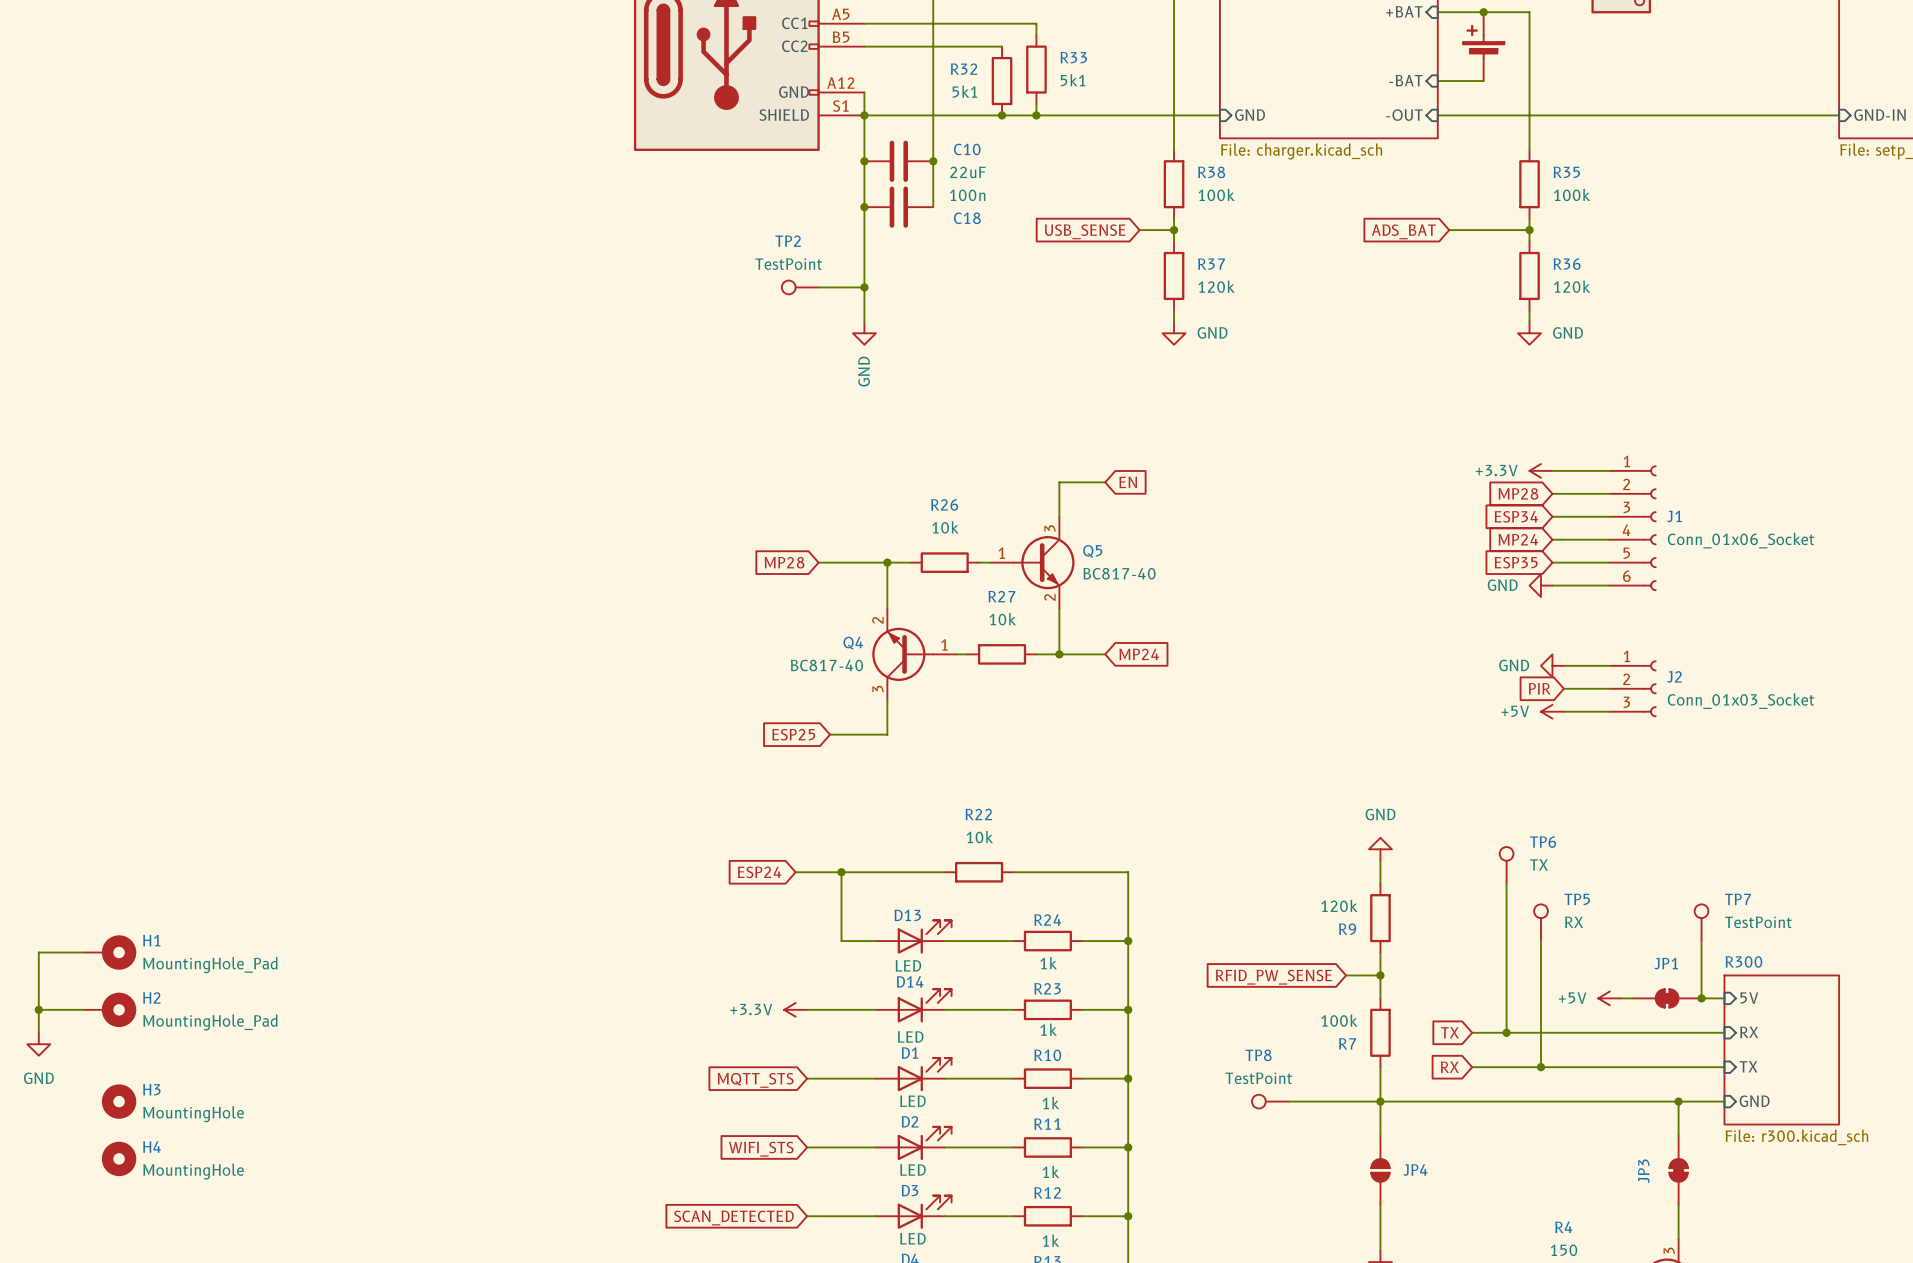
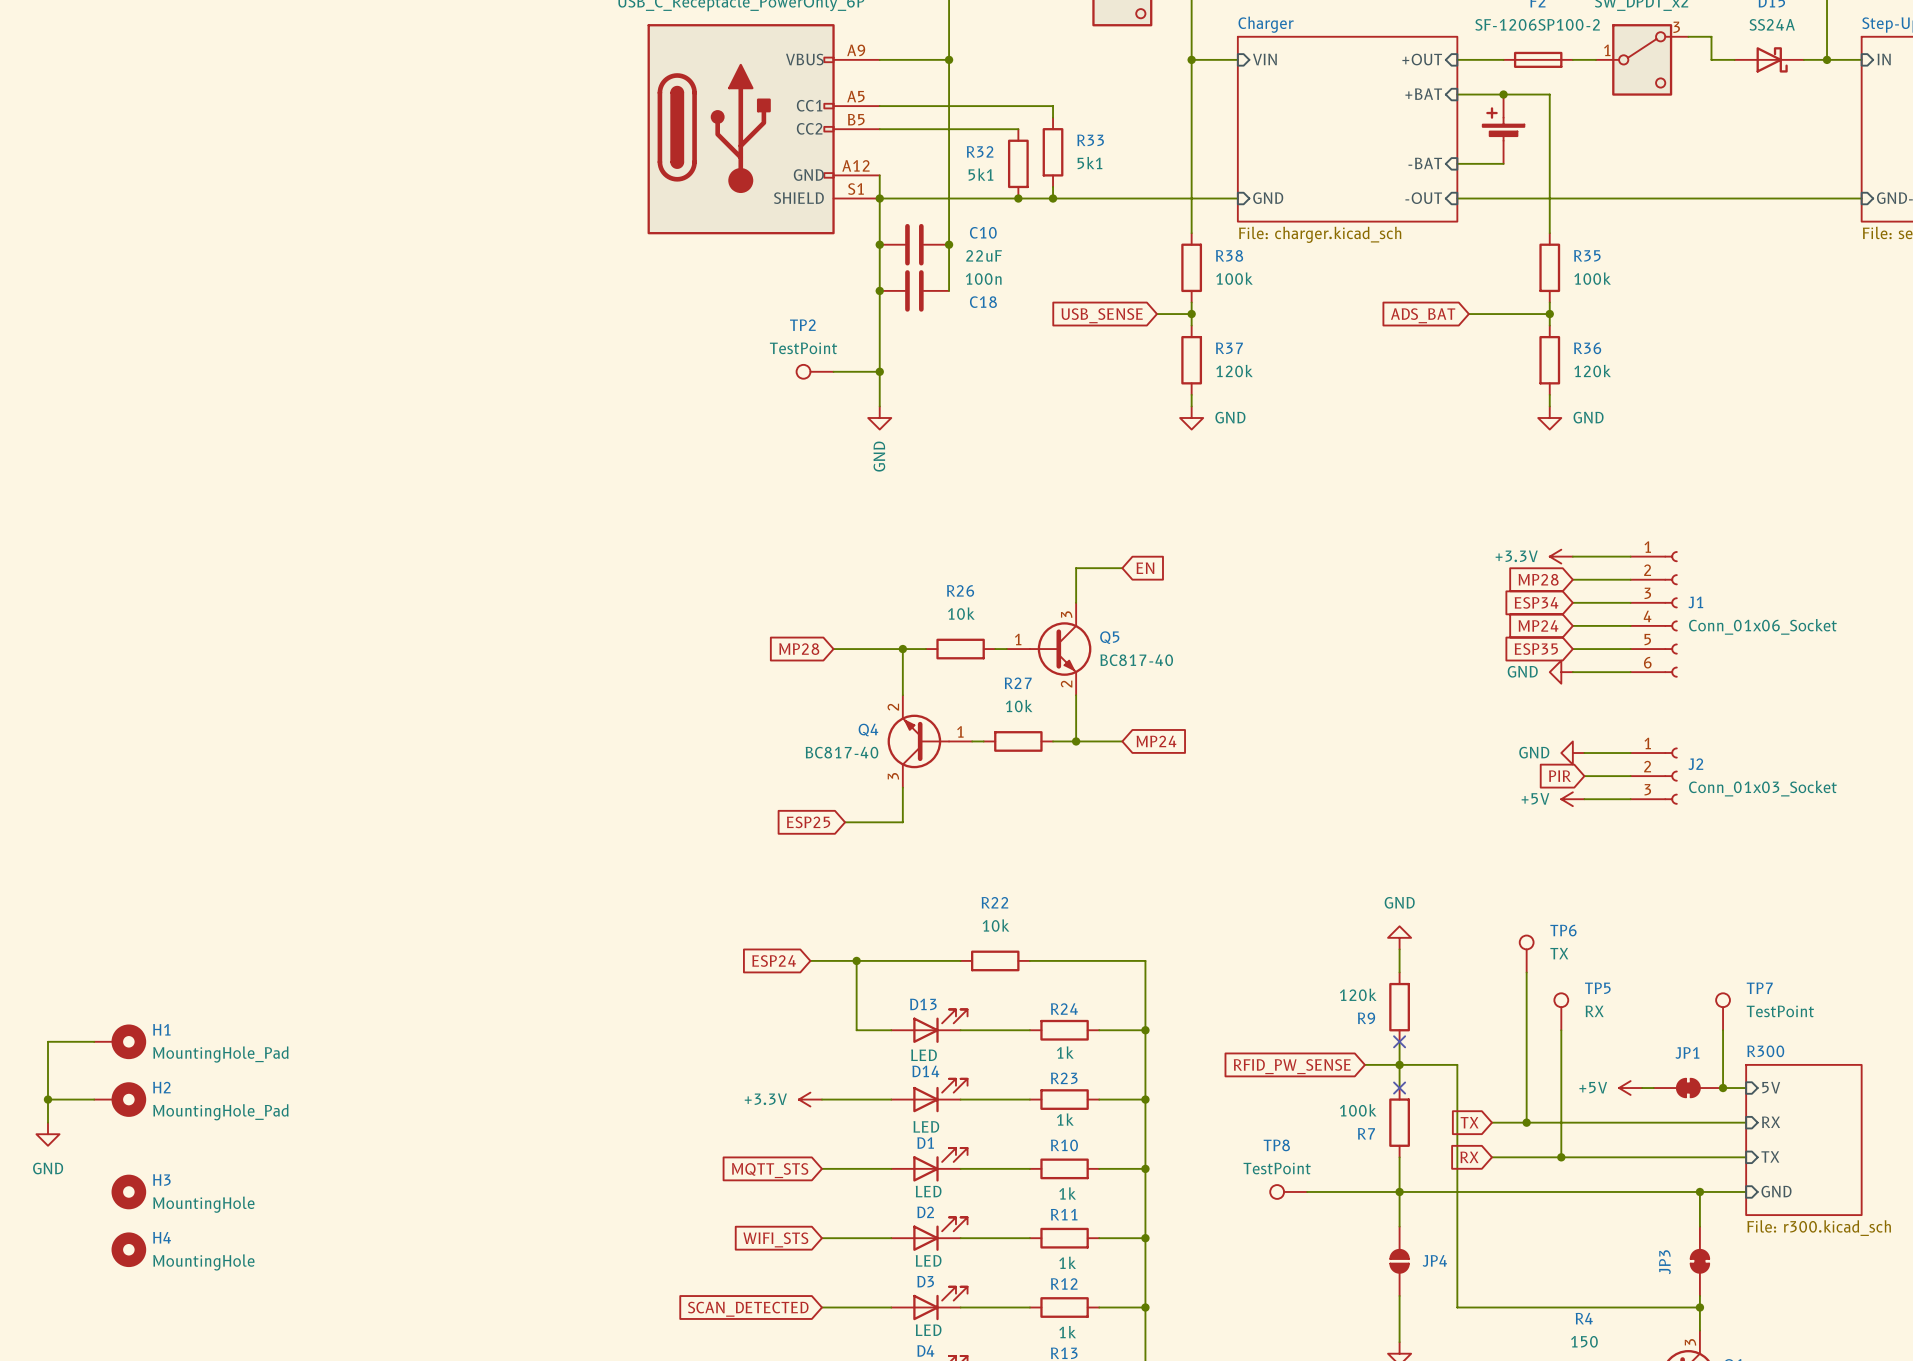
no-connect mark: none -> (1399, 1041)
wire: none -> (1399, 1064) (1457, 1064) (1457, 1307) (1699, 1307)
no-connect mark: none -> (1399, 1088)
junction: none -> (1699, 1307)

